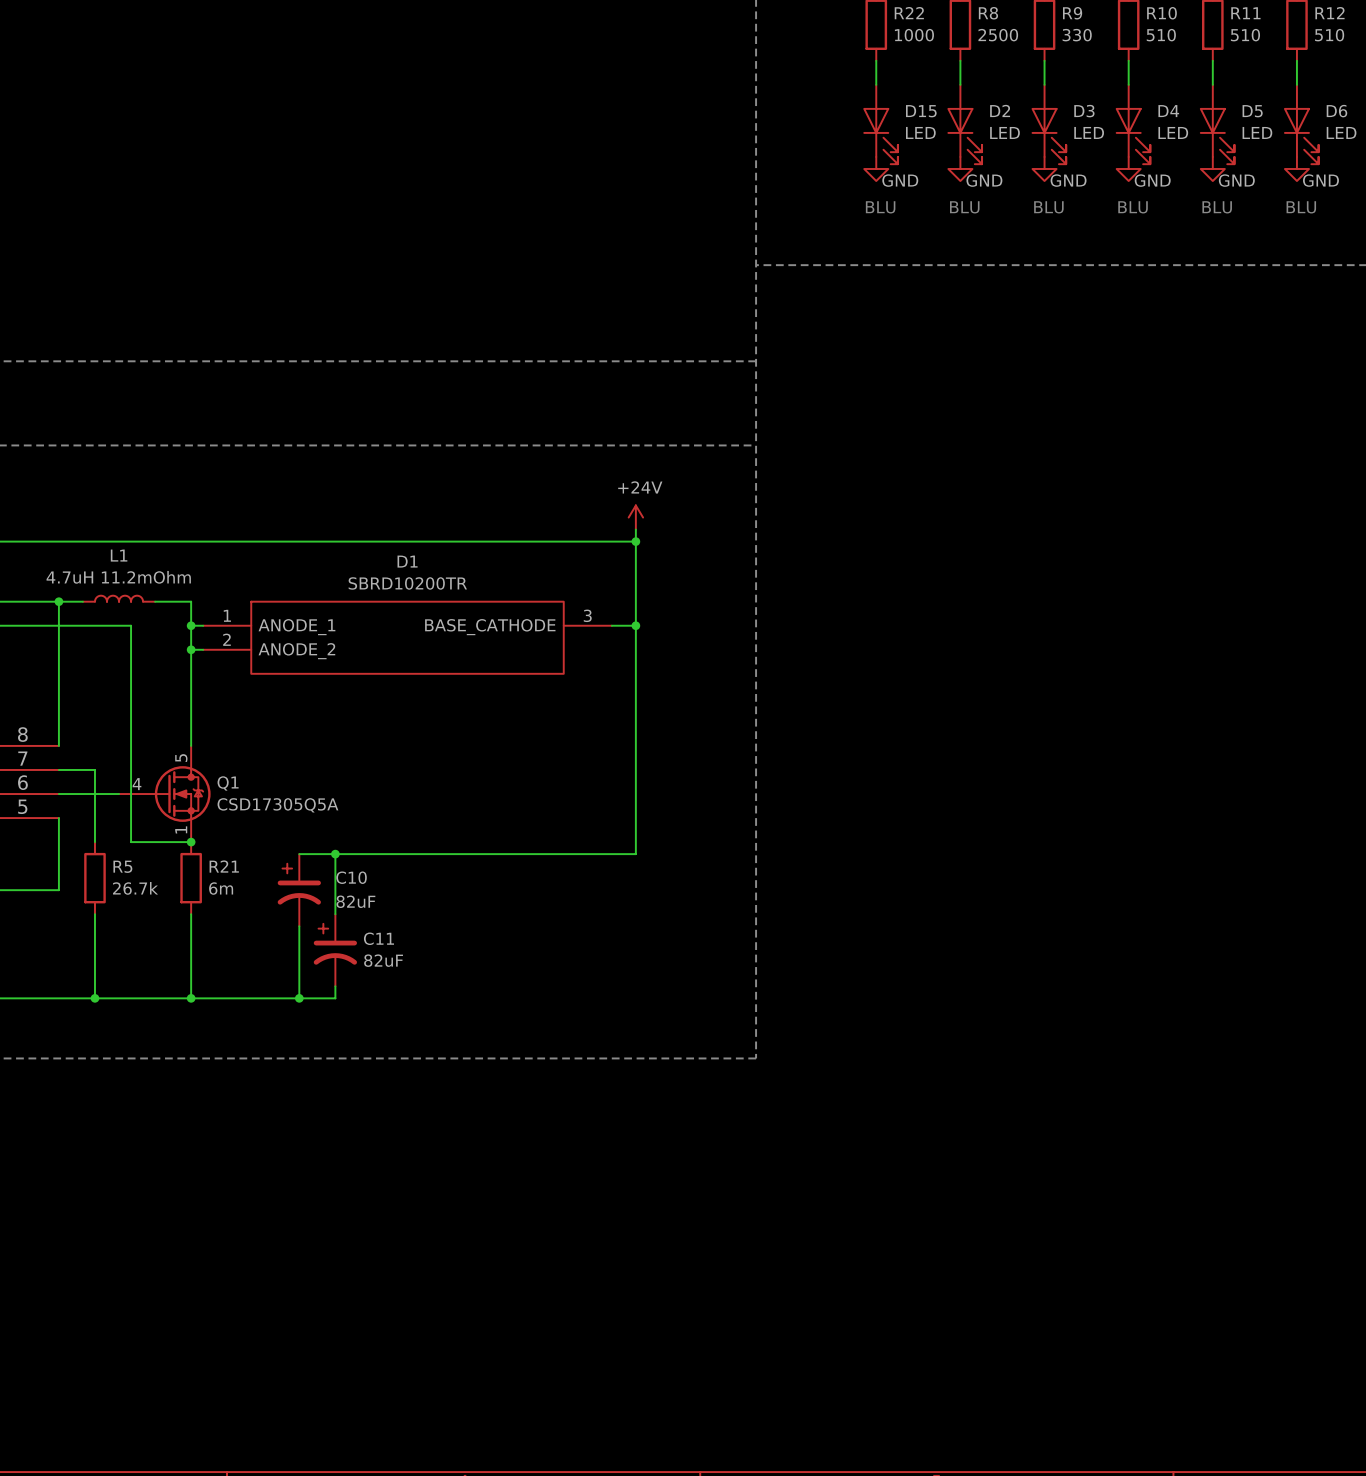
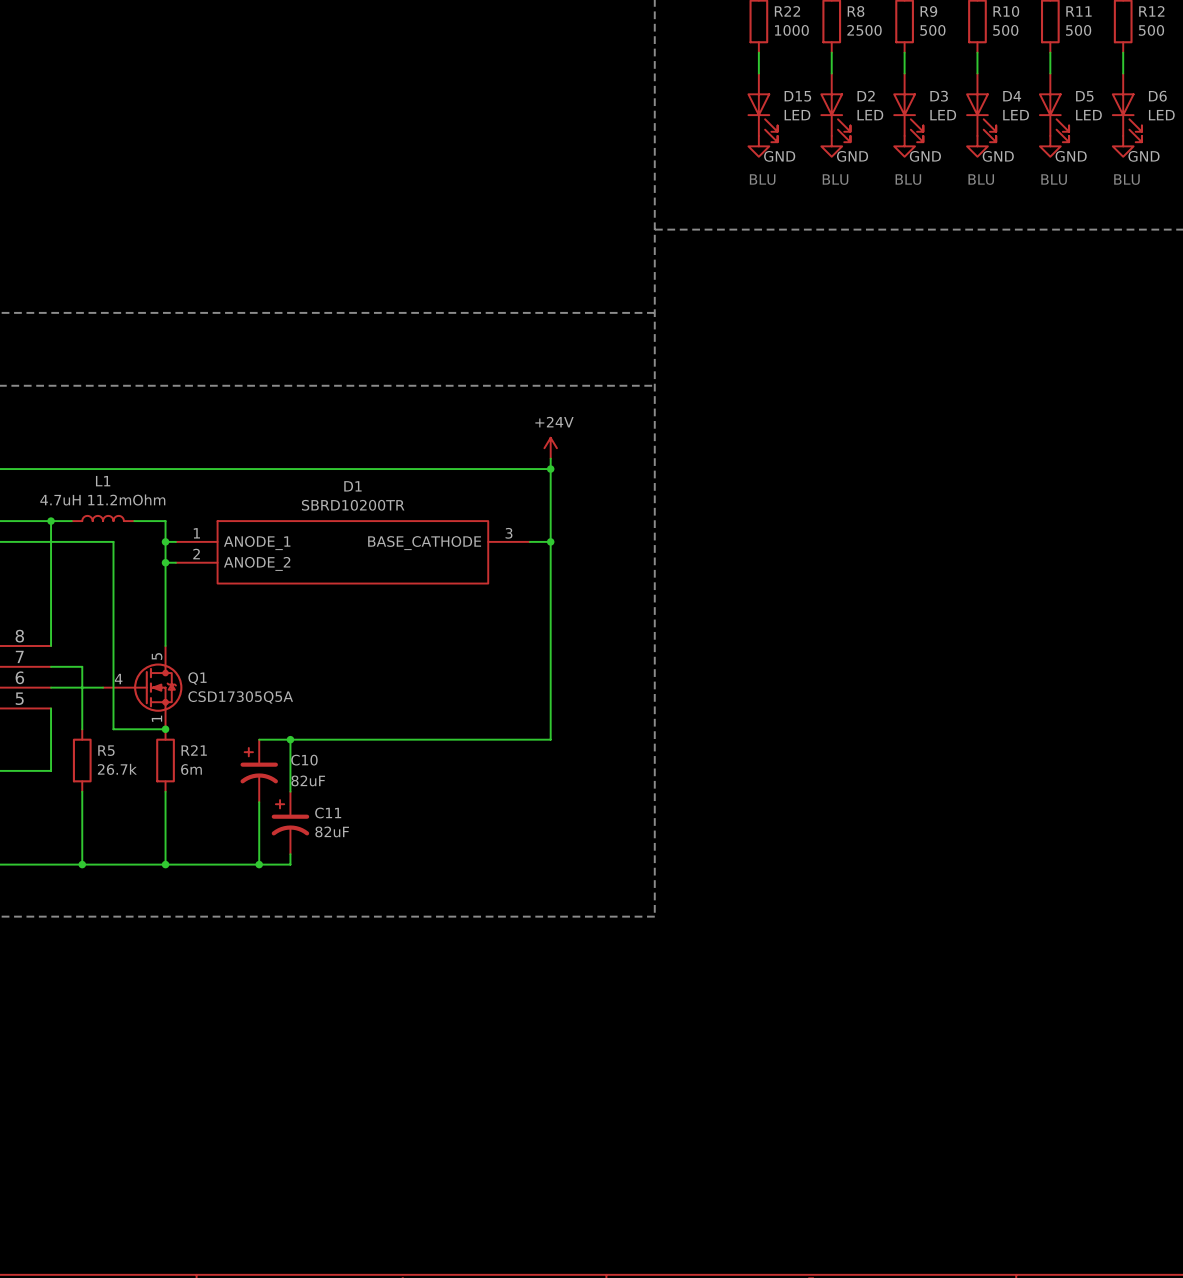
R9 value: 330 (1077, 35) -> 500 (932, 30)
R10 value: 510 (1161, 35) -> 500 (1005, 30)
R11 value: 510 (1245, 35) -> 500 (1078, 30)
R12 value: 510 (1329, 35) -> 500 (1151, 30)

